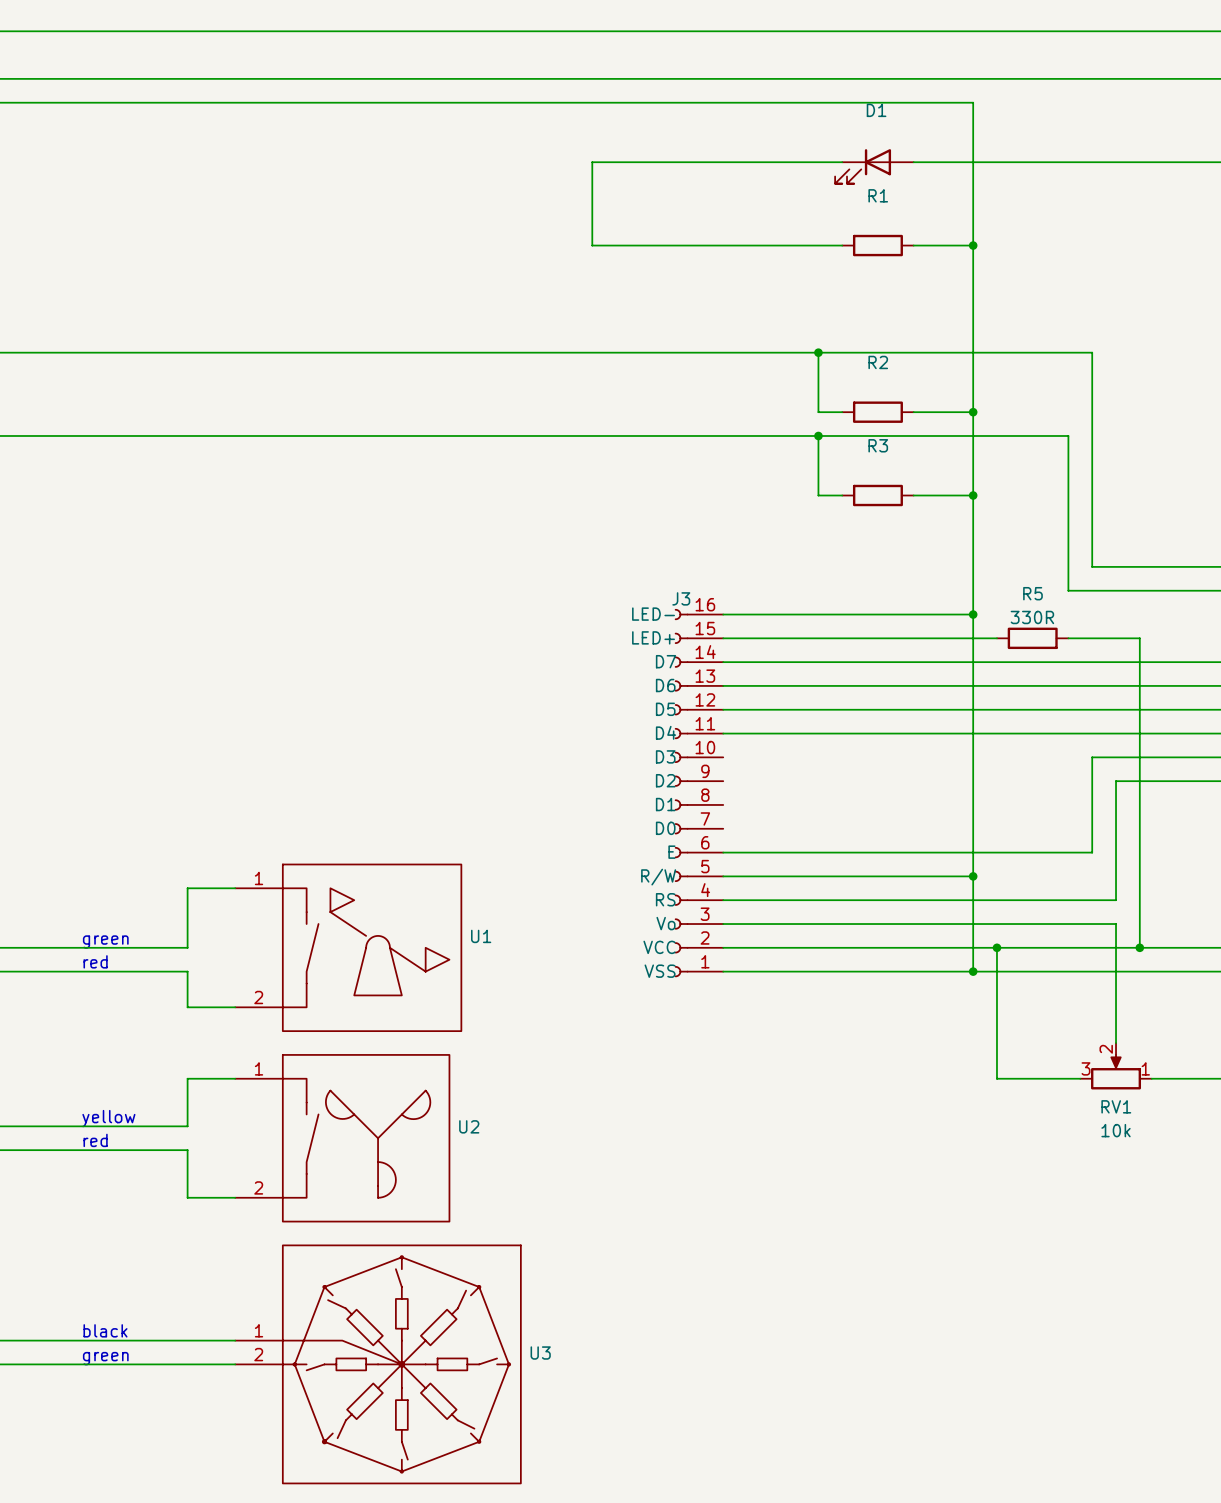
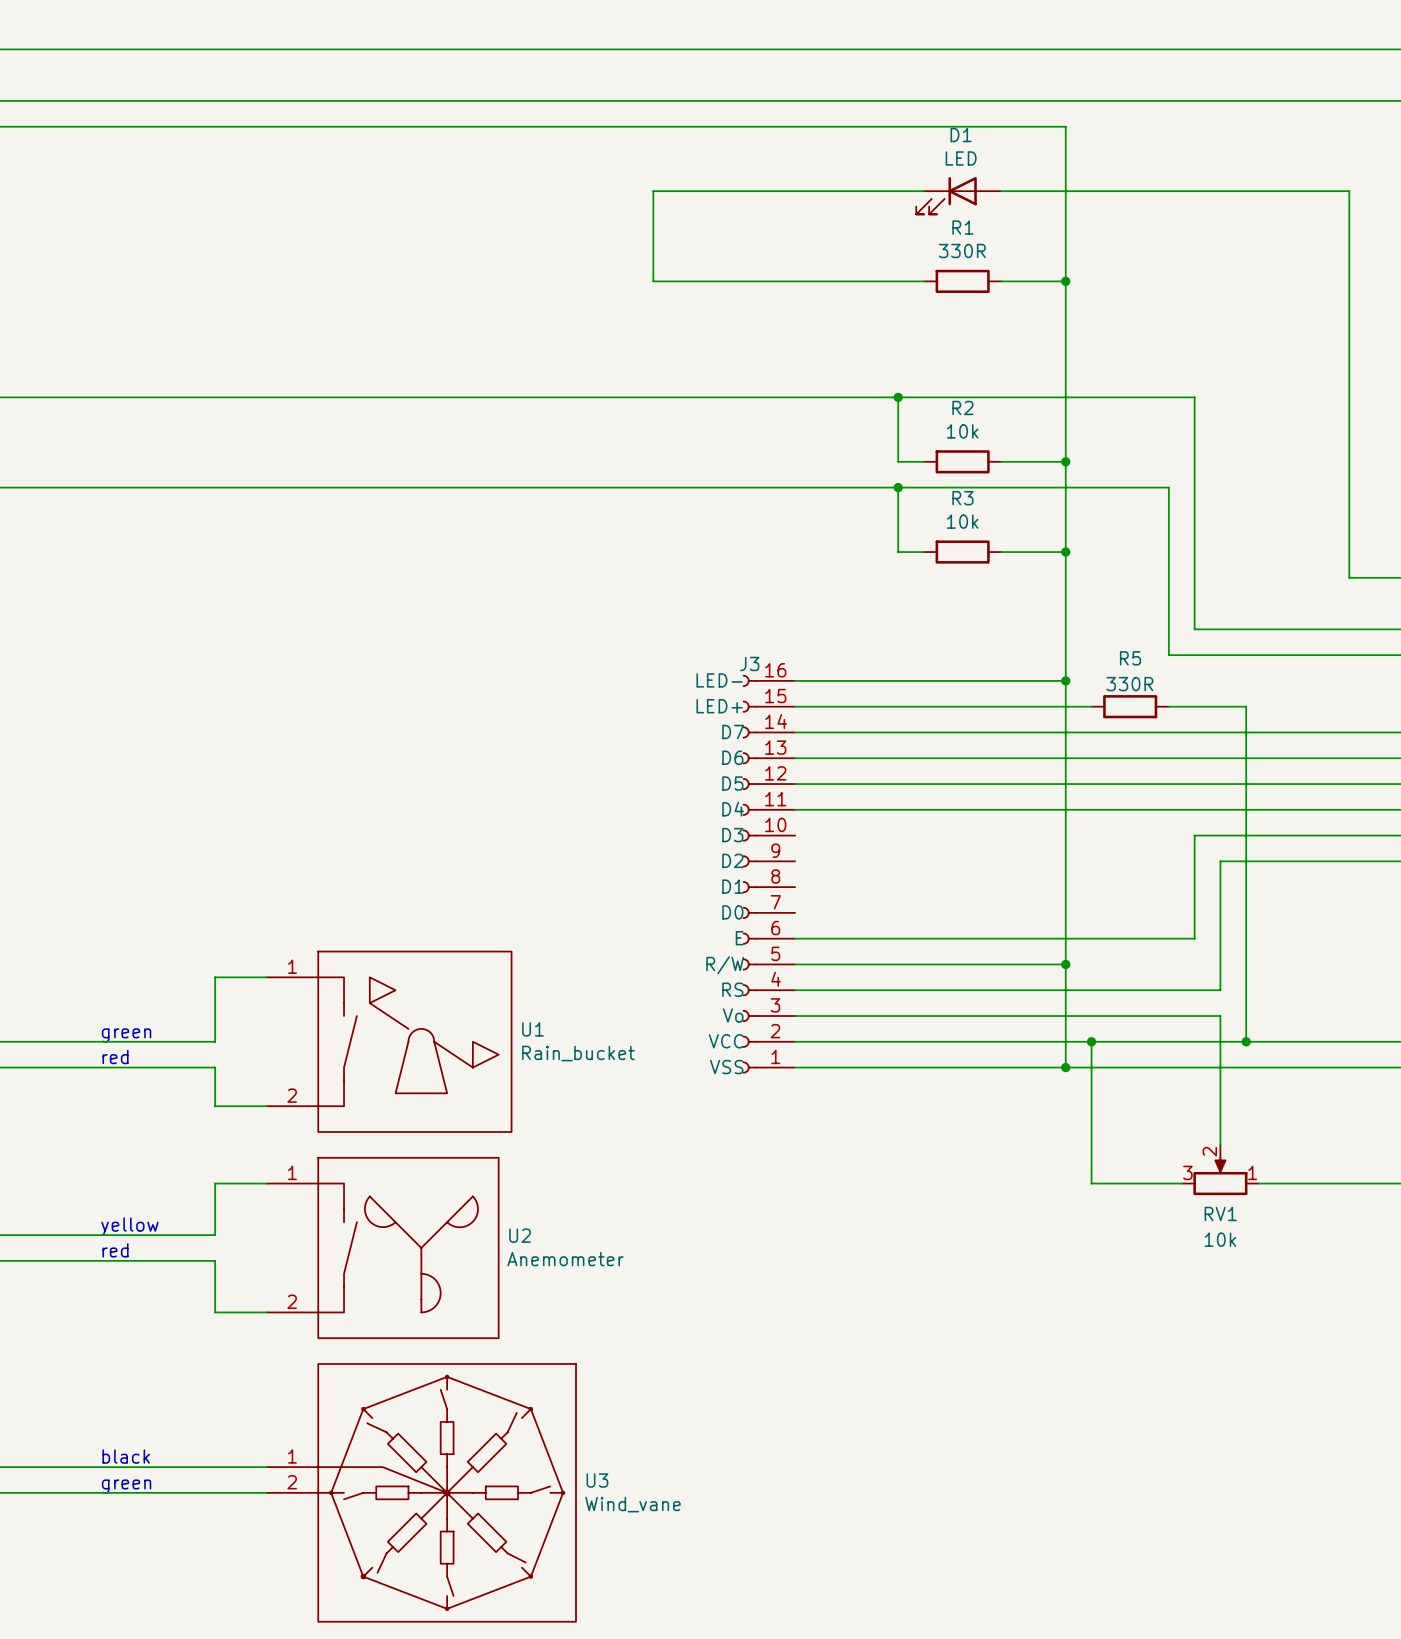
D1 value: none -> LED (961, 158)
R1 value: none -> 330R (962, 251)
R2 value: none -> 10k (962, 431)
R3 value: none -> 10k (962, 521)
U1 value: none -> Rain_bucket (578, 1053)
U2 value: none -> Anemometer (565, 1259)
U3 value: none -> Wind_vane (633, 1504)

